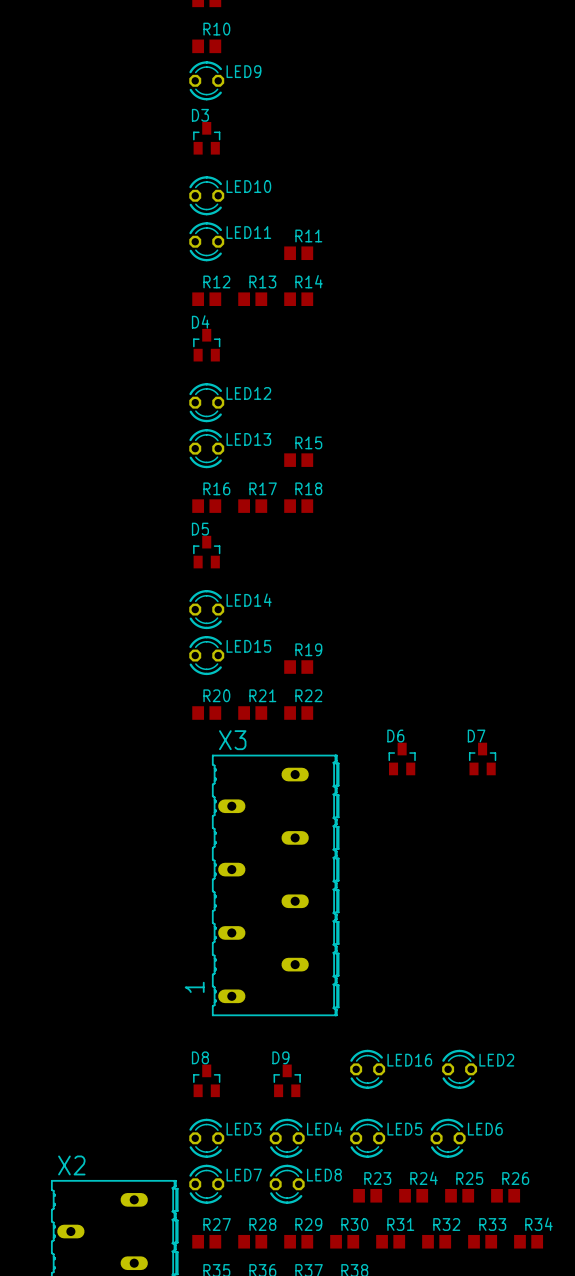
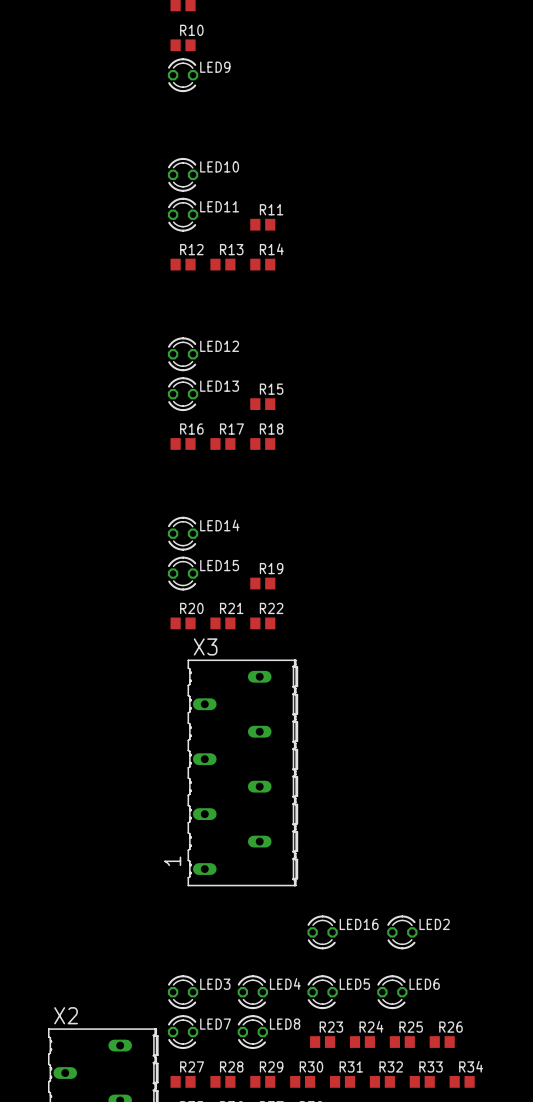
D3: (206, 138) -> none
D4: (206, 345) -> none
D5: (206, 552) -> none
D6: (402, 758) -> none
D7: (482, 758) -> none
D8: (206, 1080) -> none
D9: (287, 1080) -> none

